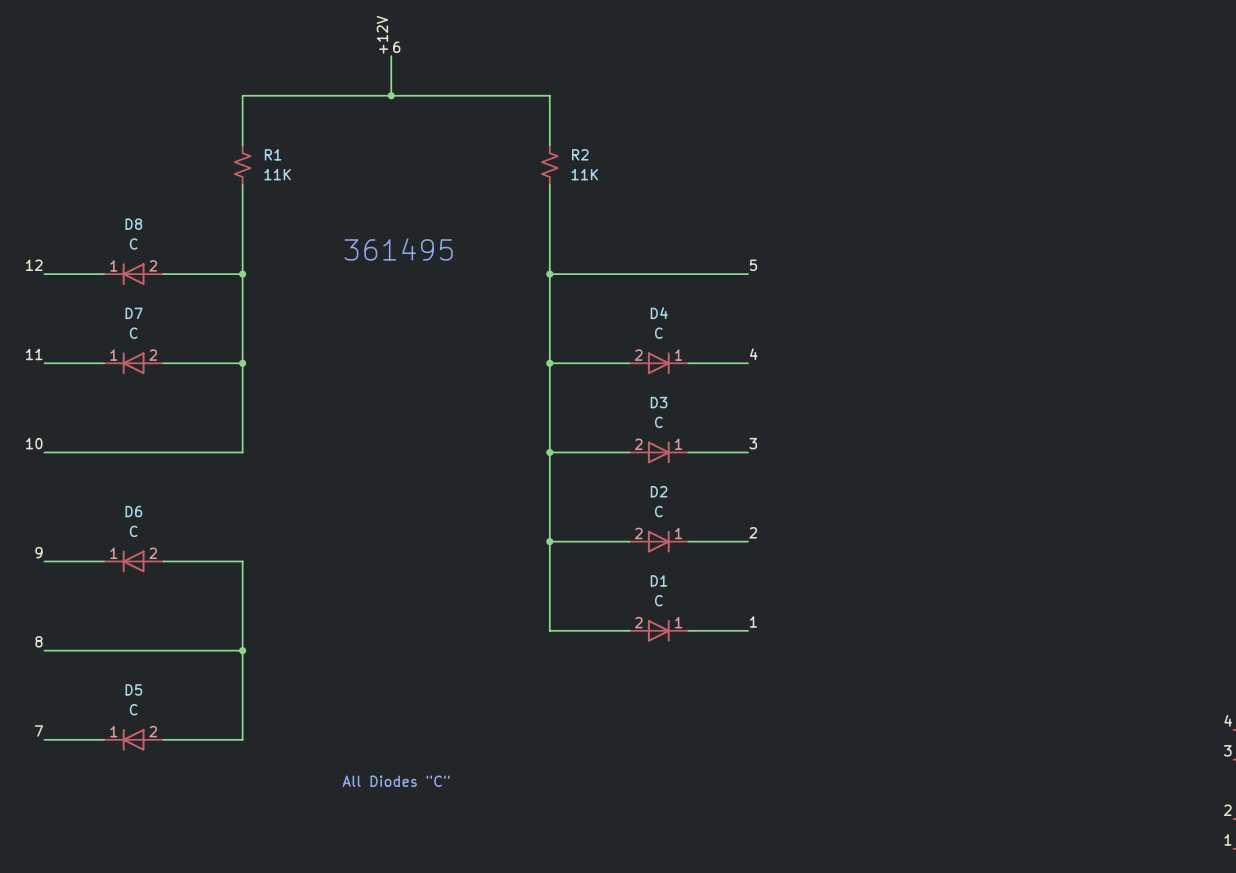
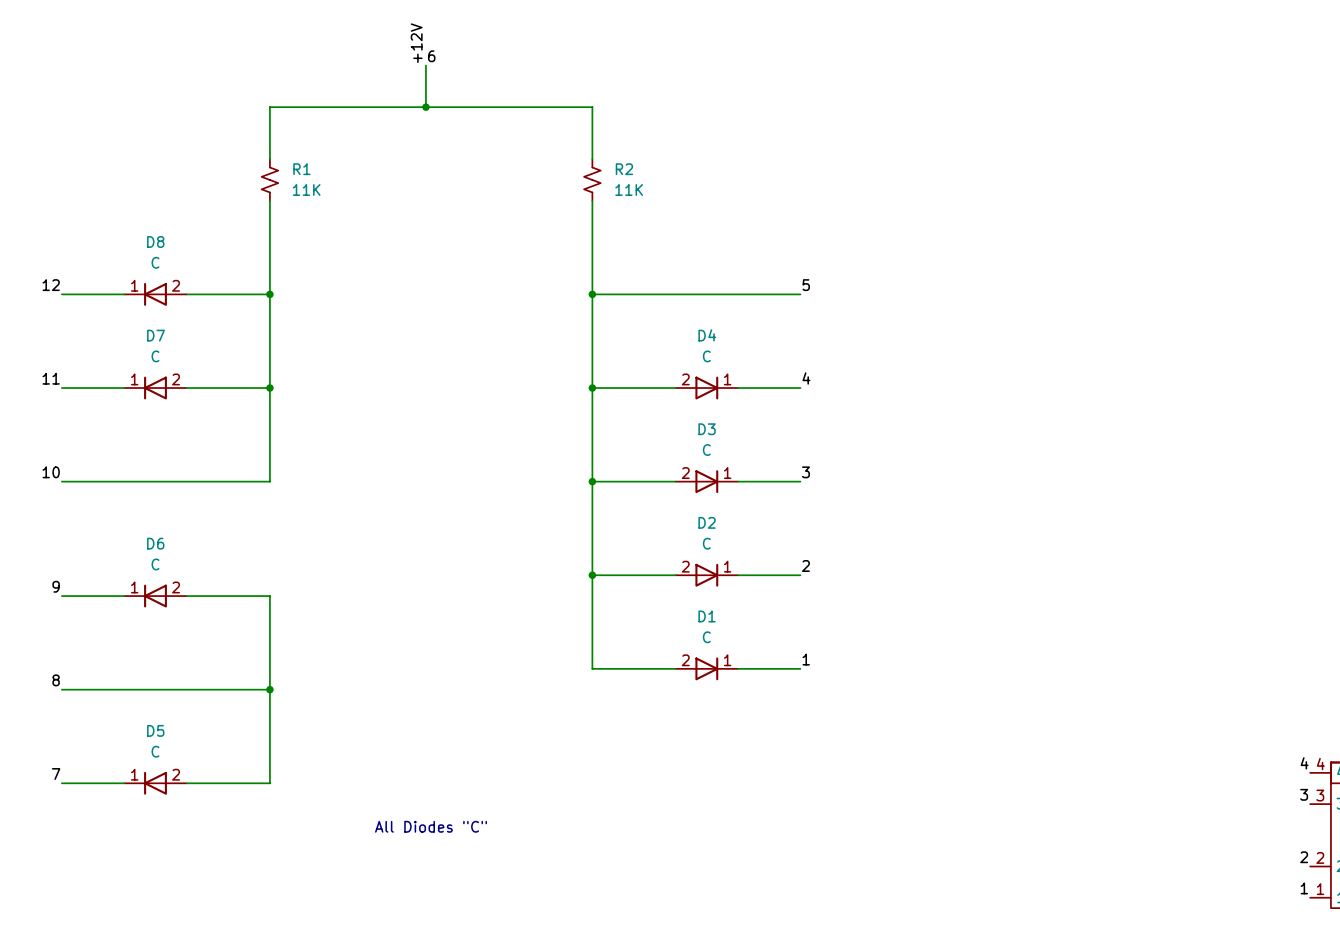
text: 361495 (398, 249) -> none

